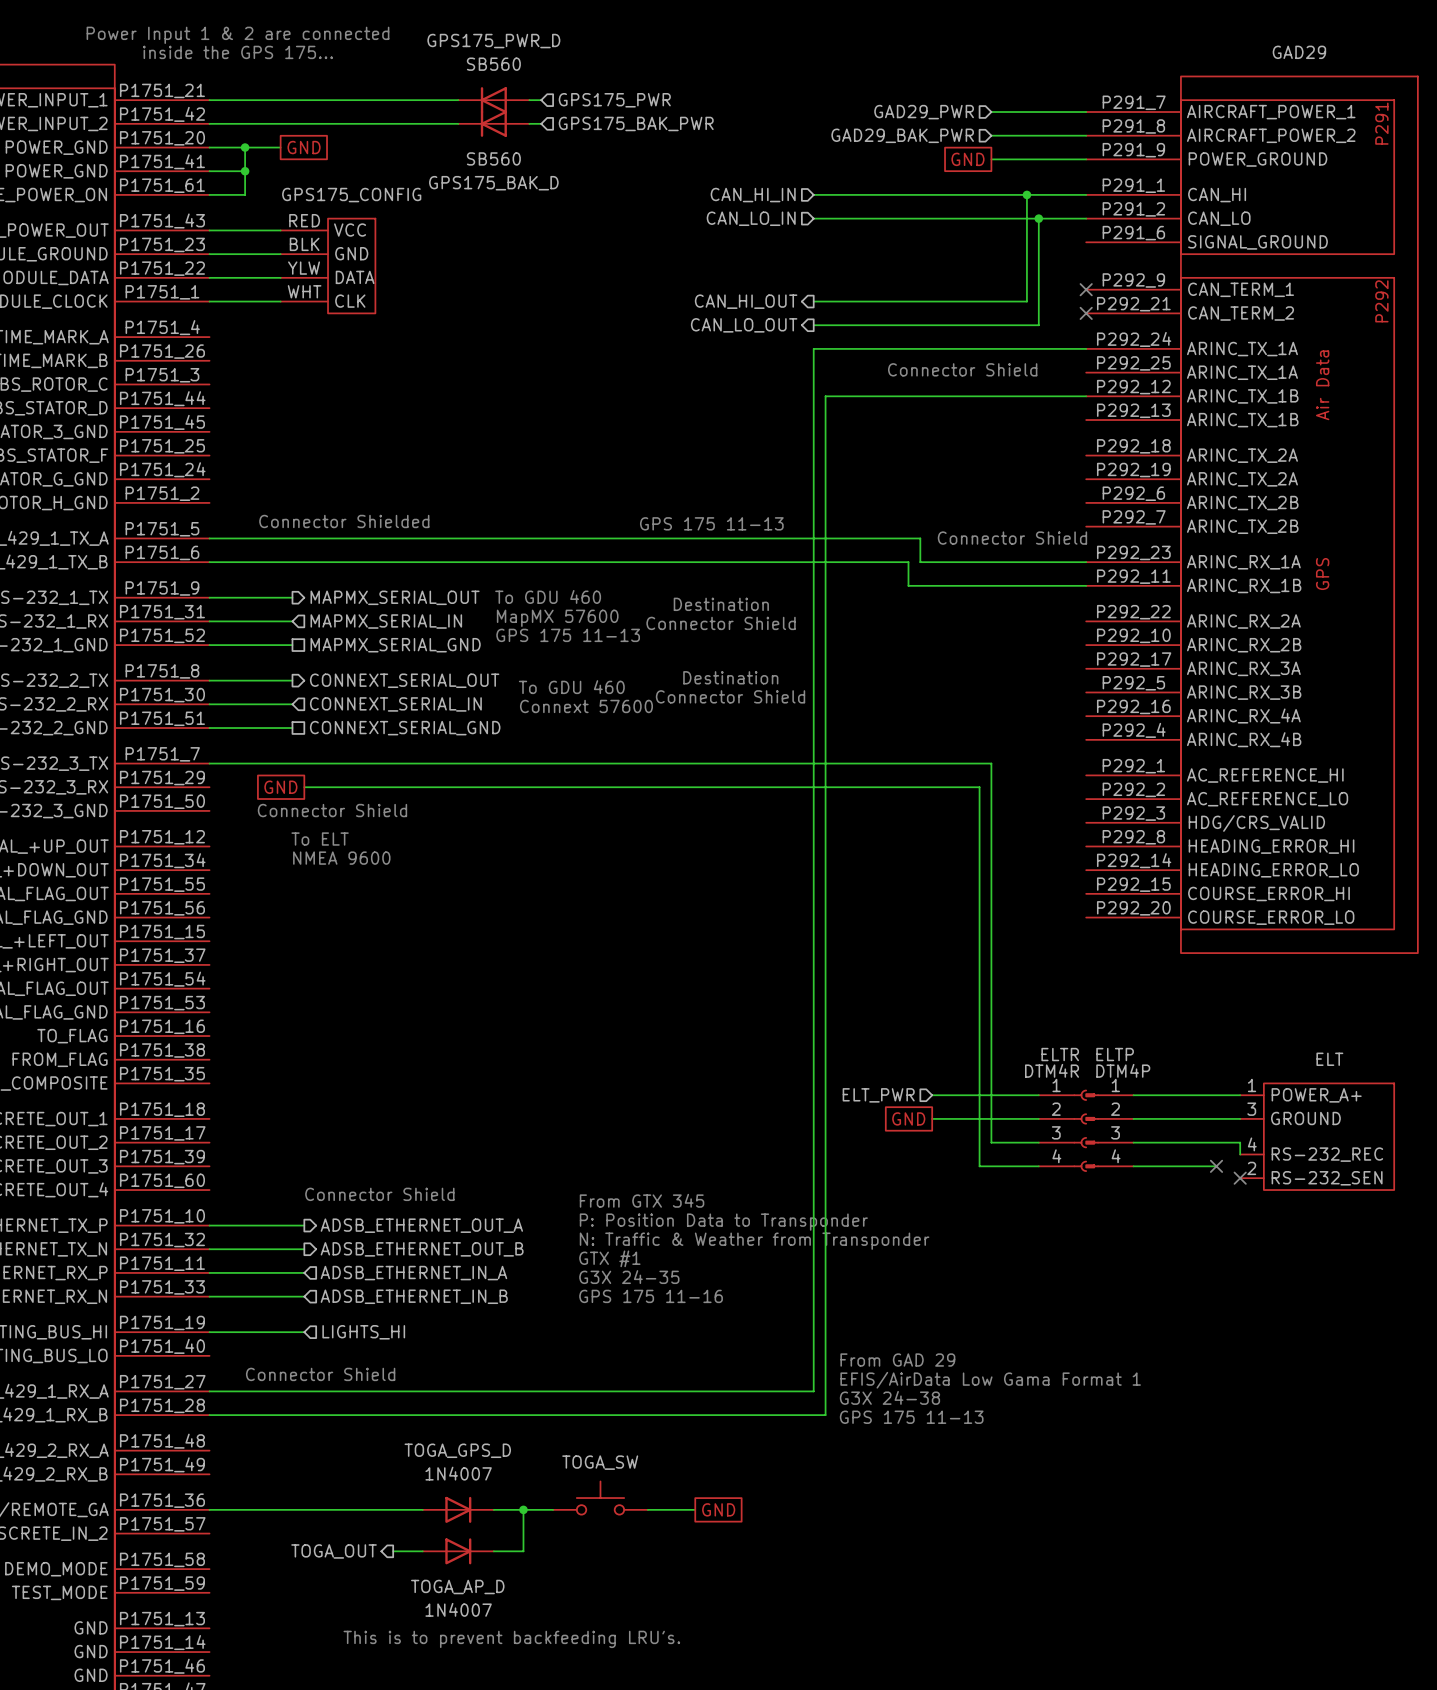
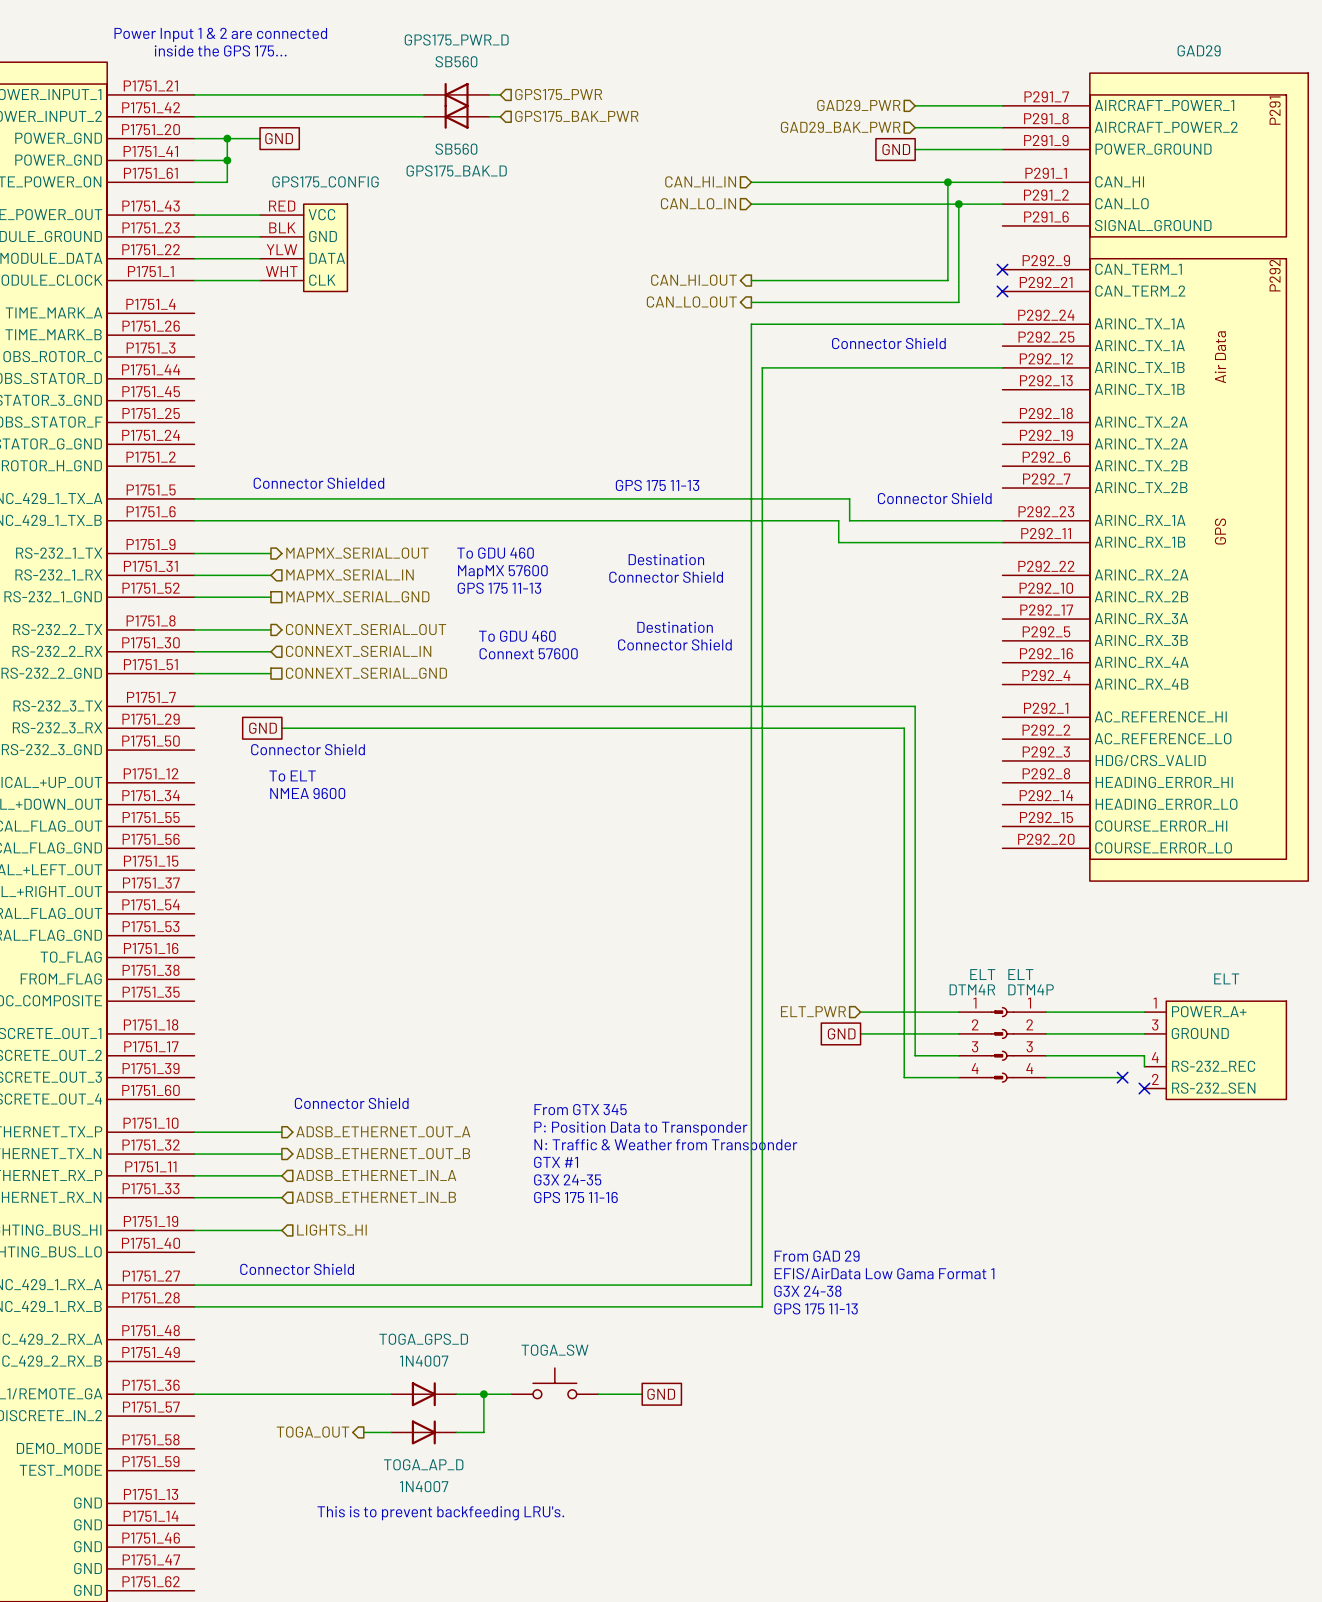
ELTR: DTM4R (1062, 1130) -> none
ELT: none -> DTM4R (980, 1044)
ELTP: DTM4P (1109, 1130) -> none
ELT: none -> DTM4P (1024, 1044)

